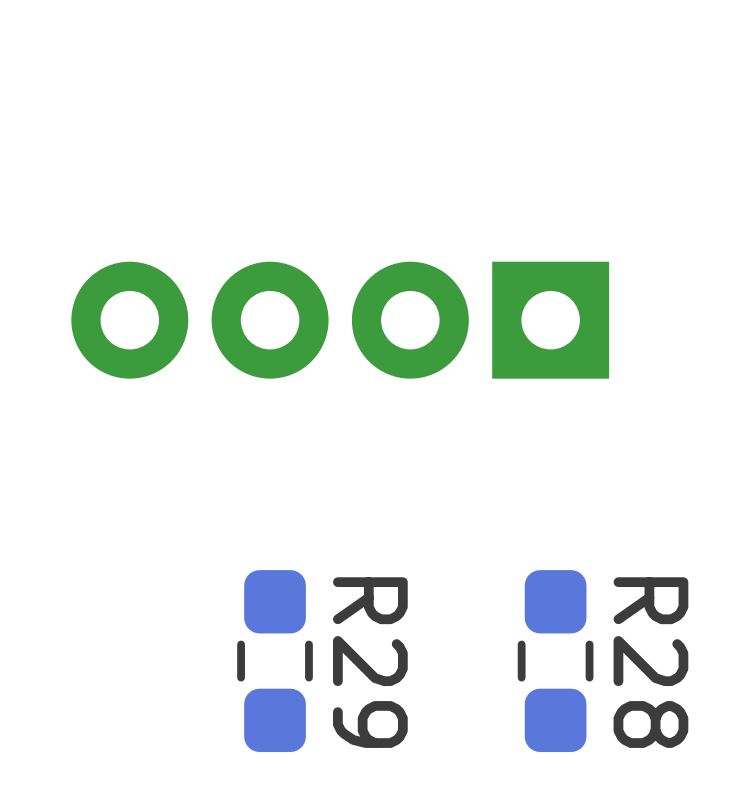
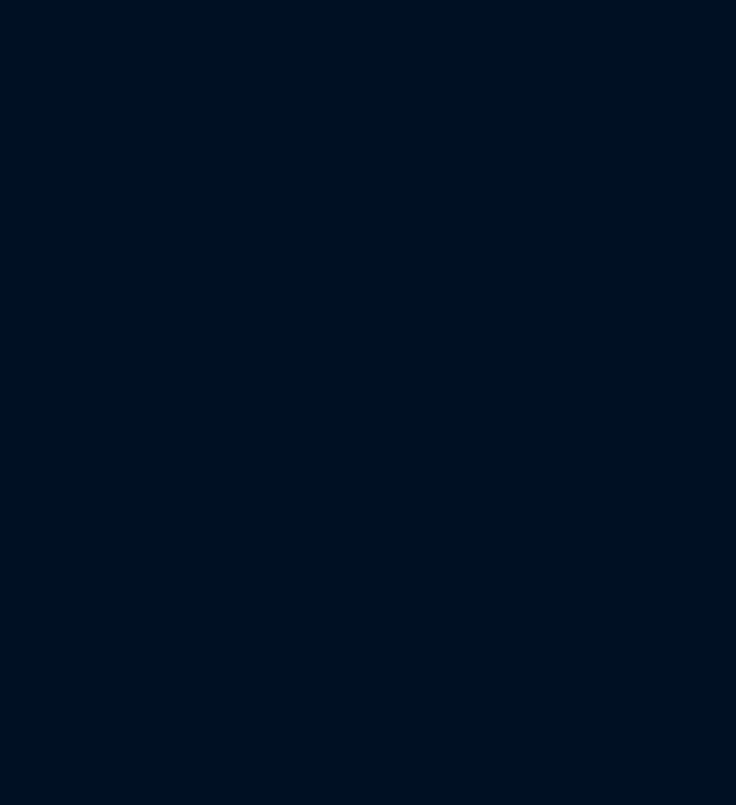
part: (340, 320) -> none
R29: (275, 661) -> none
R28: (555, 661) -> none

